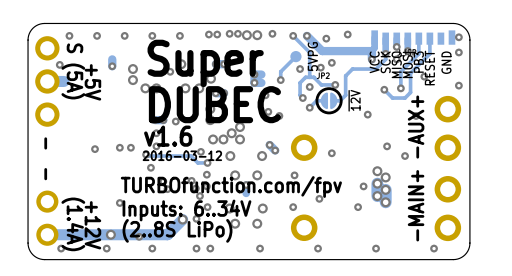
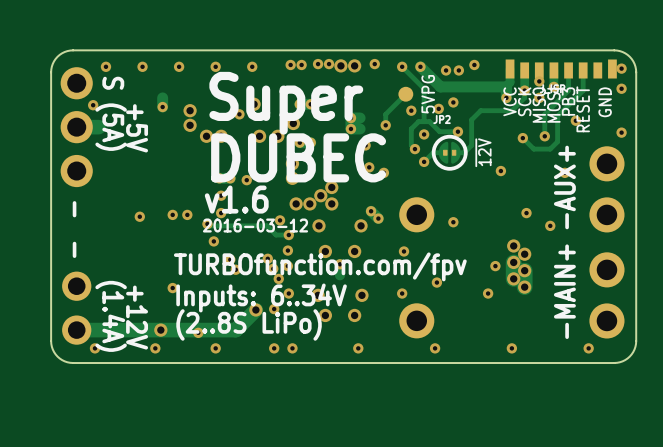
via: none -> (458, 70)

